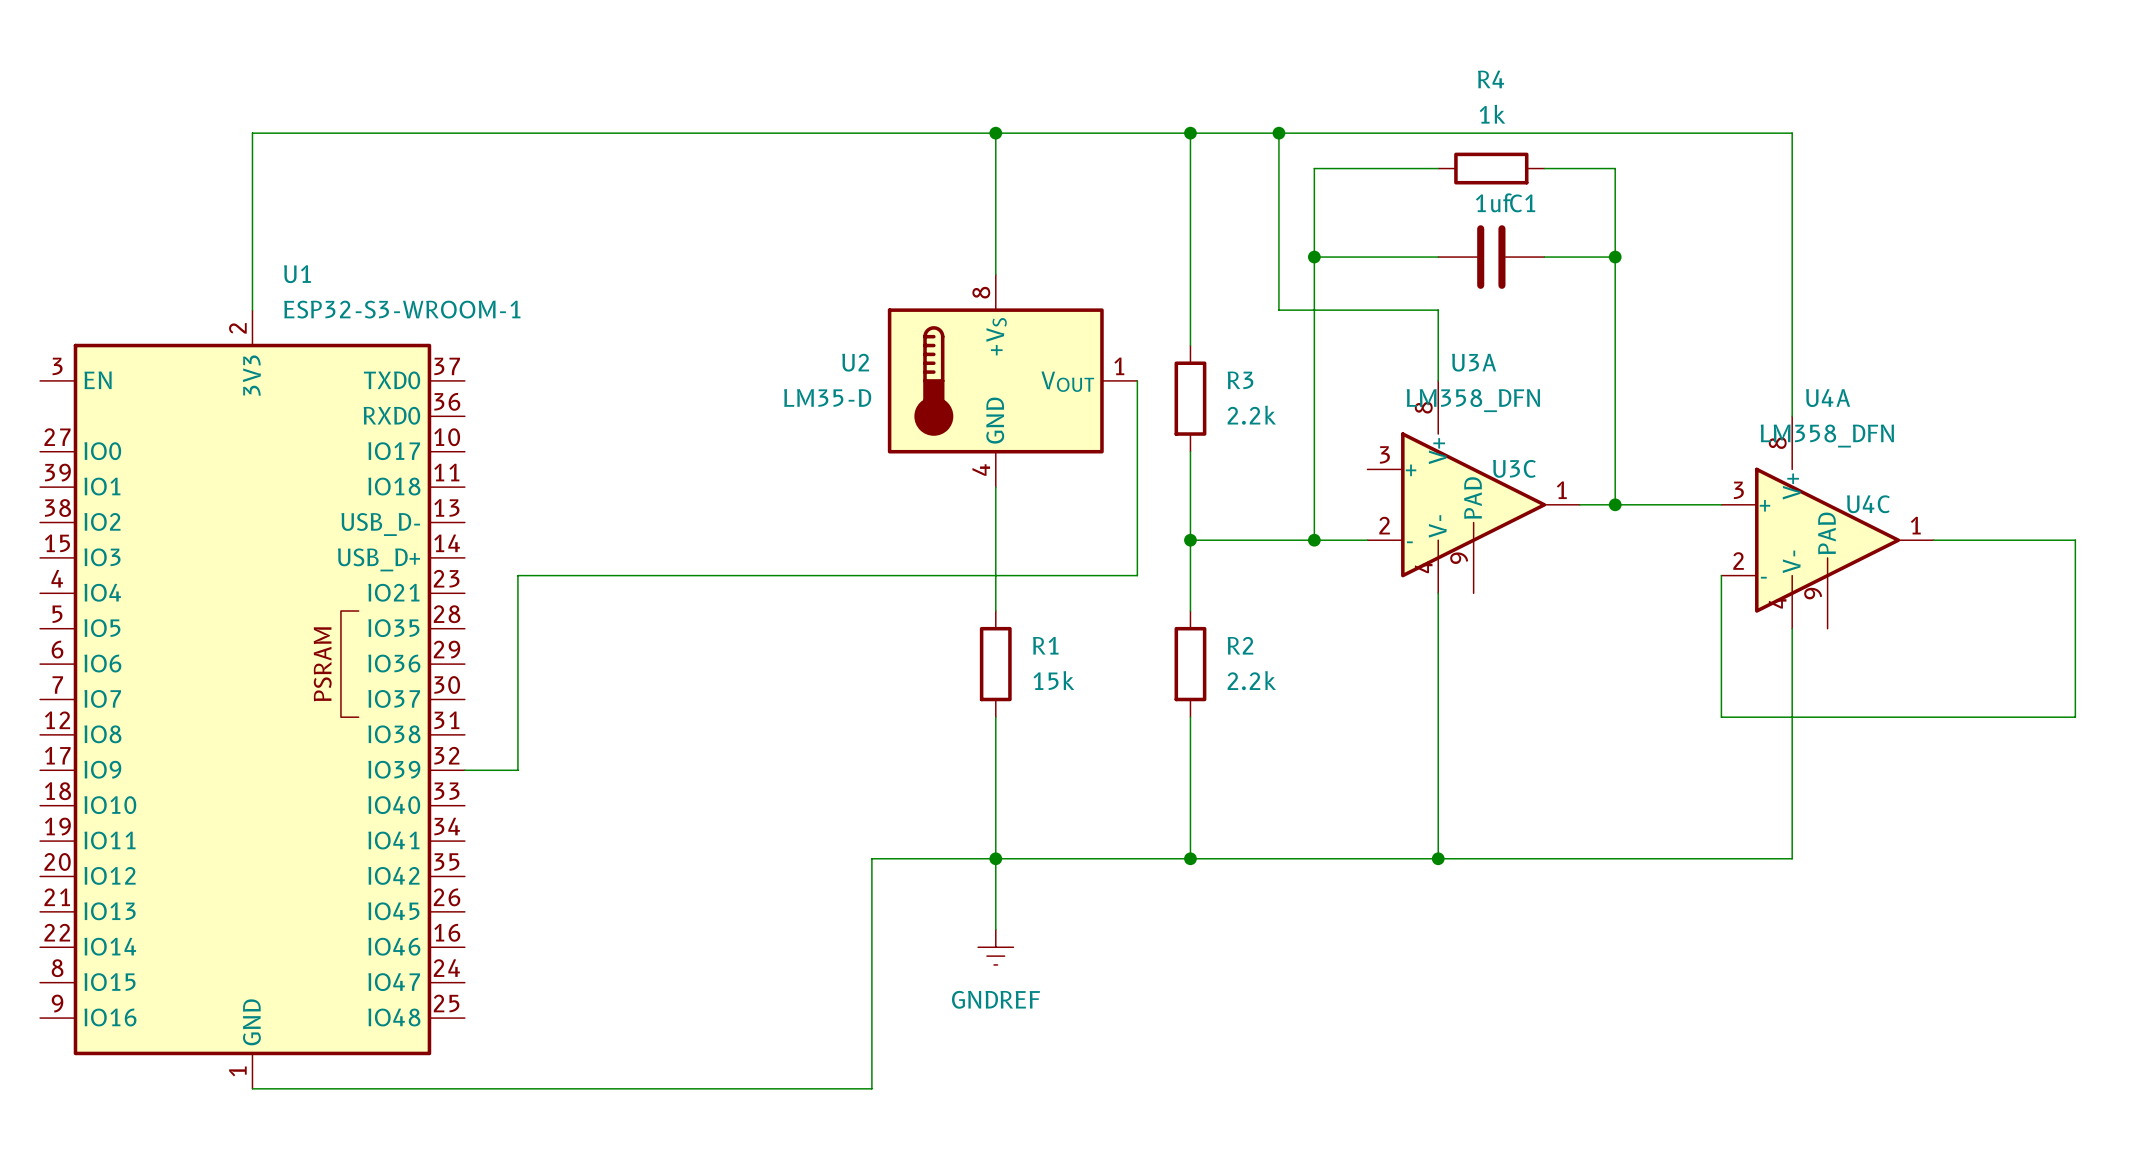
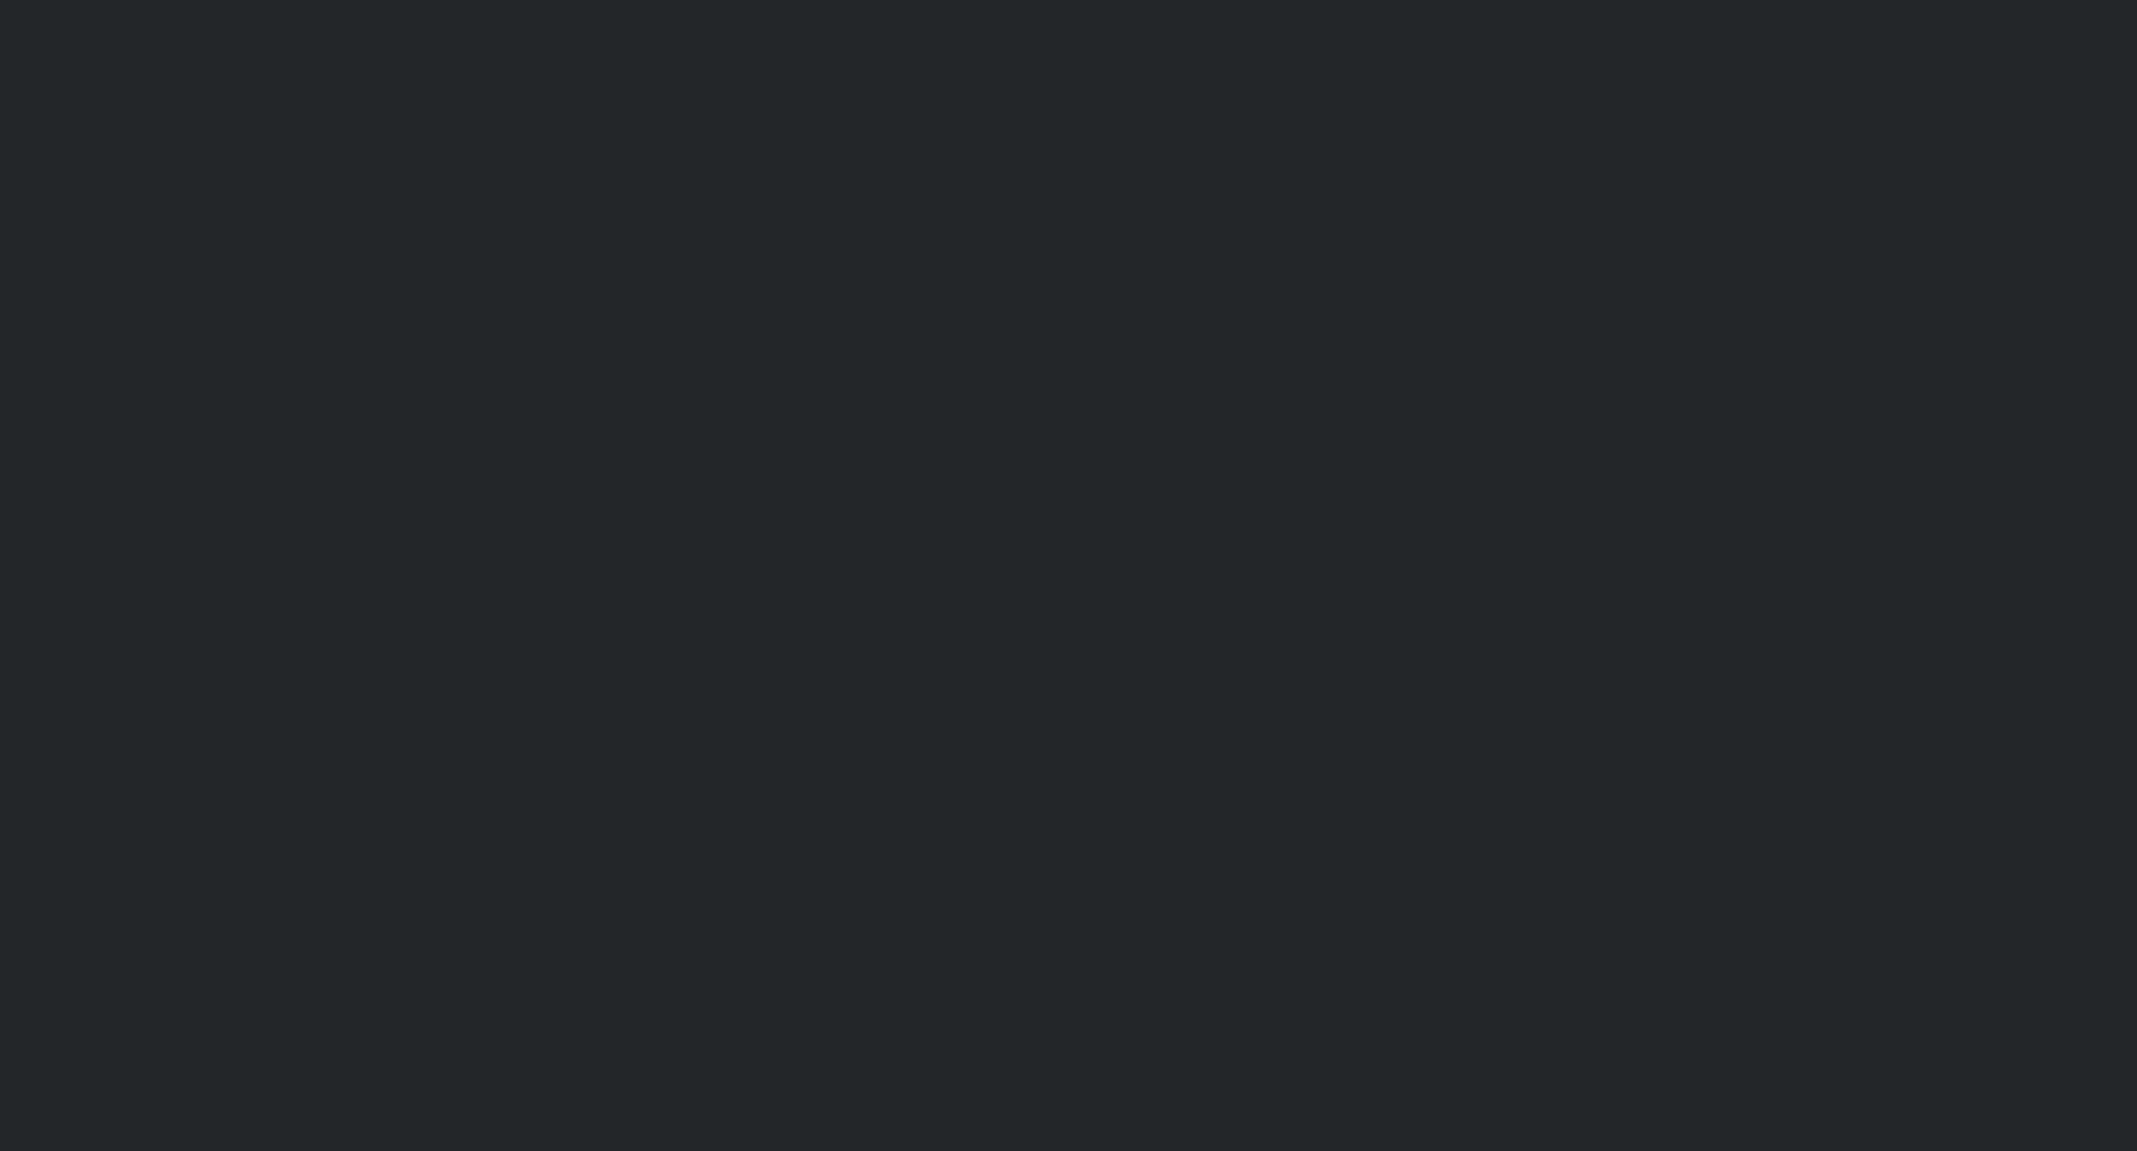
wire: (995, 133) (995, 274) -> none
junction: (995, 133) -> none
wire: (1190, 133) (1190, 345) -> none
junction: (1190, 133) -> none
wire: (1278, 133) (1278, 310) (1438, 310) (1438, 380) -> none
junction: (1278, 133) -> none
wire: (1438, 168) (1314, 168) (1314, 540) -> none
R4: 1k (1491, 168) -> none
wire: (1544, 168) (1615, 168) (1615, 504) -> none
wire: (1314, 257) (1438, 257) -> none
junction: (1314, 257) -> none
C1: 1uf (1491, 257) -> none
wire: (1544, 257) (1615, 257) -> none
junction: (1615, 257) -> none
wire: (252, 310) (252, 133) (1792, 133) (1792, 416) -> none
U2: LM35-D (1012, 380) -> none
wire: (1137, 380) (1137, 575) (517, 575) (517, 770) (464, 770) -> none
R3: 2.2k (1190, 398) -> none
wire: (1190, 451) (1190, 611) -> none
wire: (995, 487) (995, 611) -> none
U3C: (1455, 487) -> none
U3A: LM358_DFN (1473, 504) -> none
wire: (1579, 504) (1721, 504) -> none
junction: (1615, 504) -> none
U4C: (1809, 522) -> none
wire: (1190, 540) (1367, 540) -> none
junction: (1190, 540) -> none
junction: (1314, 540) -> none
U4A: LM358_DFN (1827, 540) -> none
wire: (1933, 540) (2075, 540) (2075, 717) (1721, 717) (1721, 575) -> none
wire: (1438, 593) (1438, 858) -> none
wire: (1792, 628) (1792, 858) (871, 858) (871, 1088) (252, 1088) -> none
R1: 15k (995, 664) -> none
R2: 2.2k (1190, 664) -> none
U1: ESP32-S3-WROOM-1 (252, 699) -> none
wire: (995, 717) (995, 929) -> none
wire: (1190, 717) (1190, 858) -> none
junction: (995, 858) -> none
junction: (1190, 858) -> none
junction: (1438, 858) -> none
power symbol: GNDREF (995, 947) -> none

